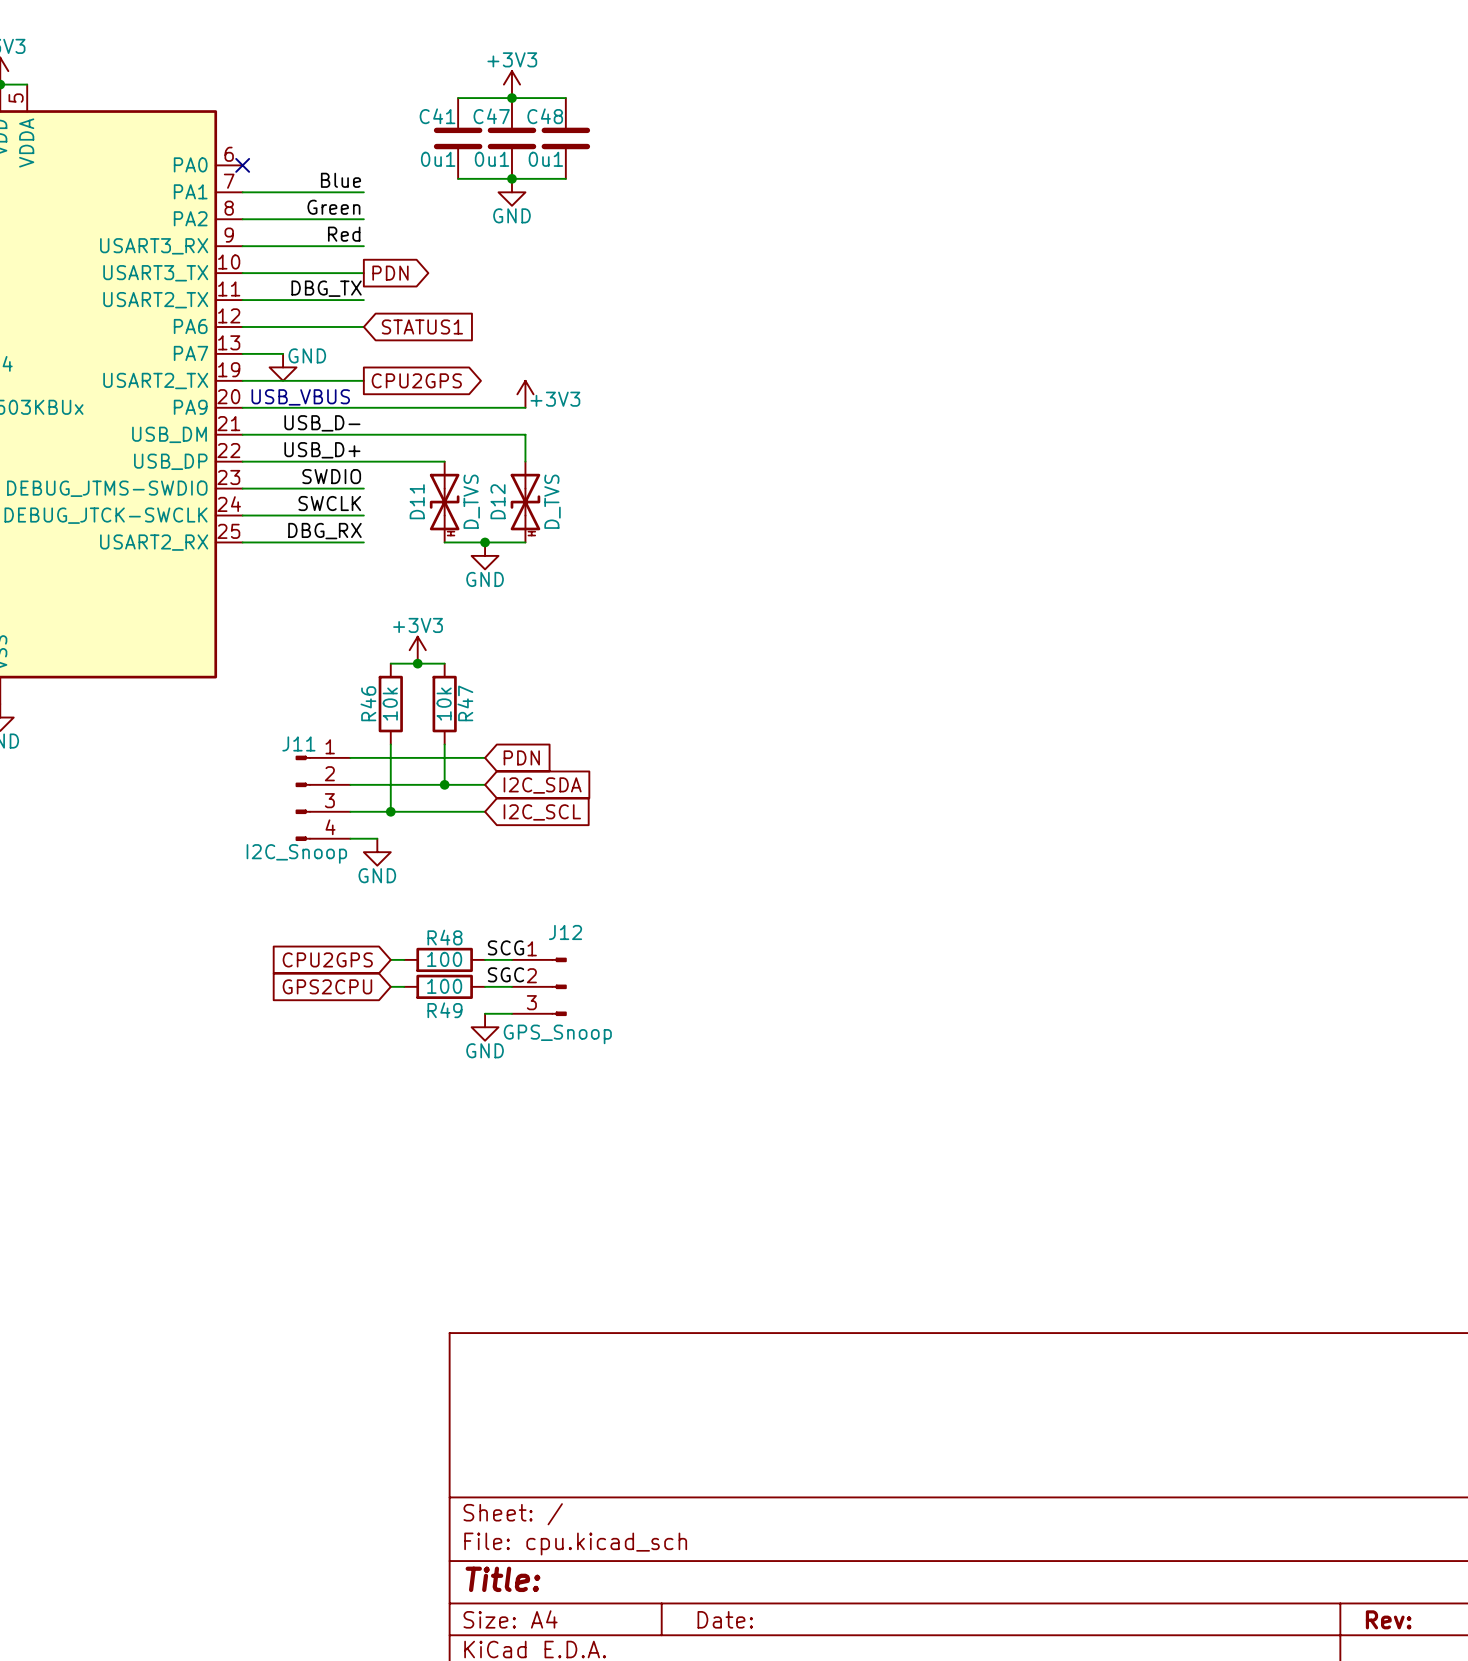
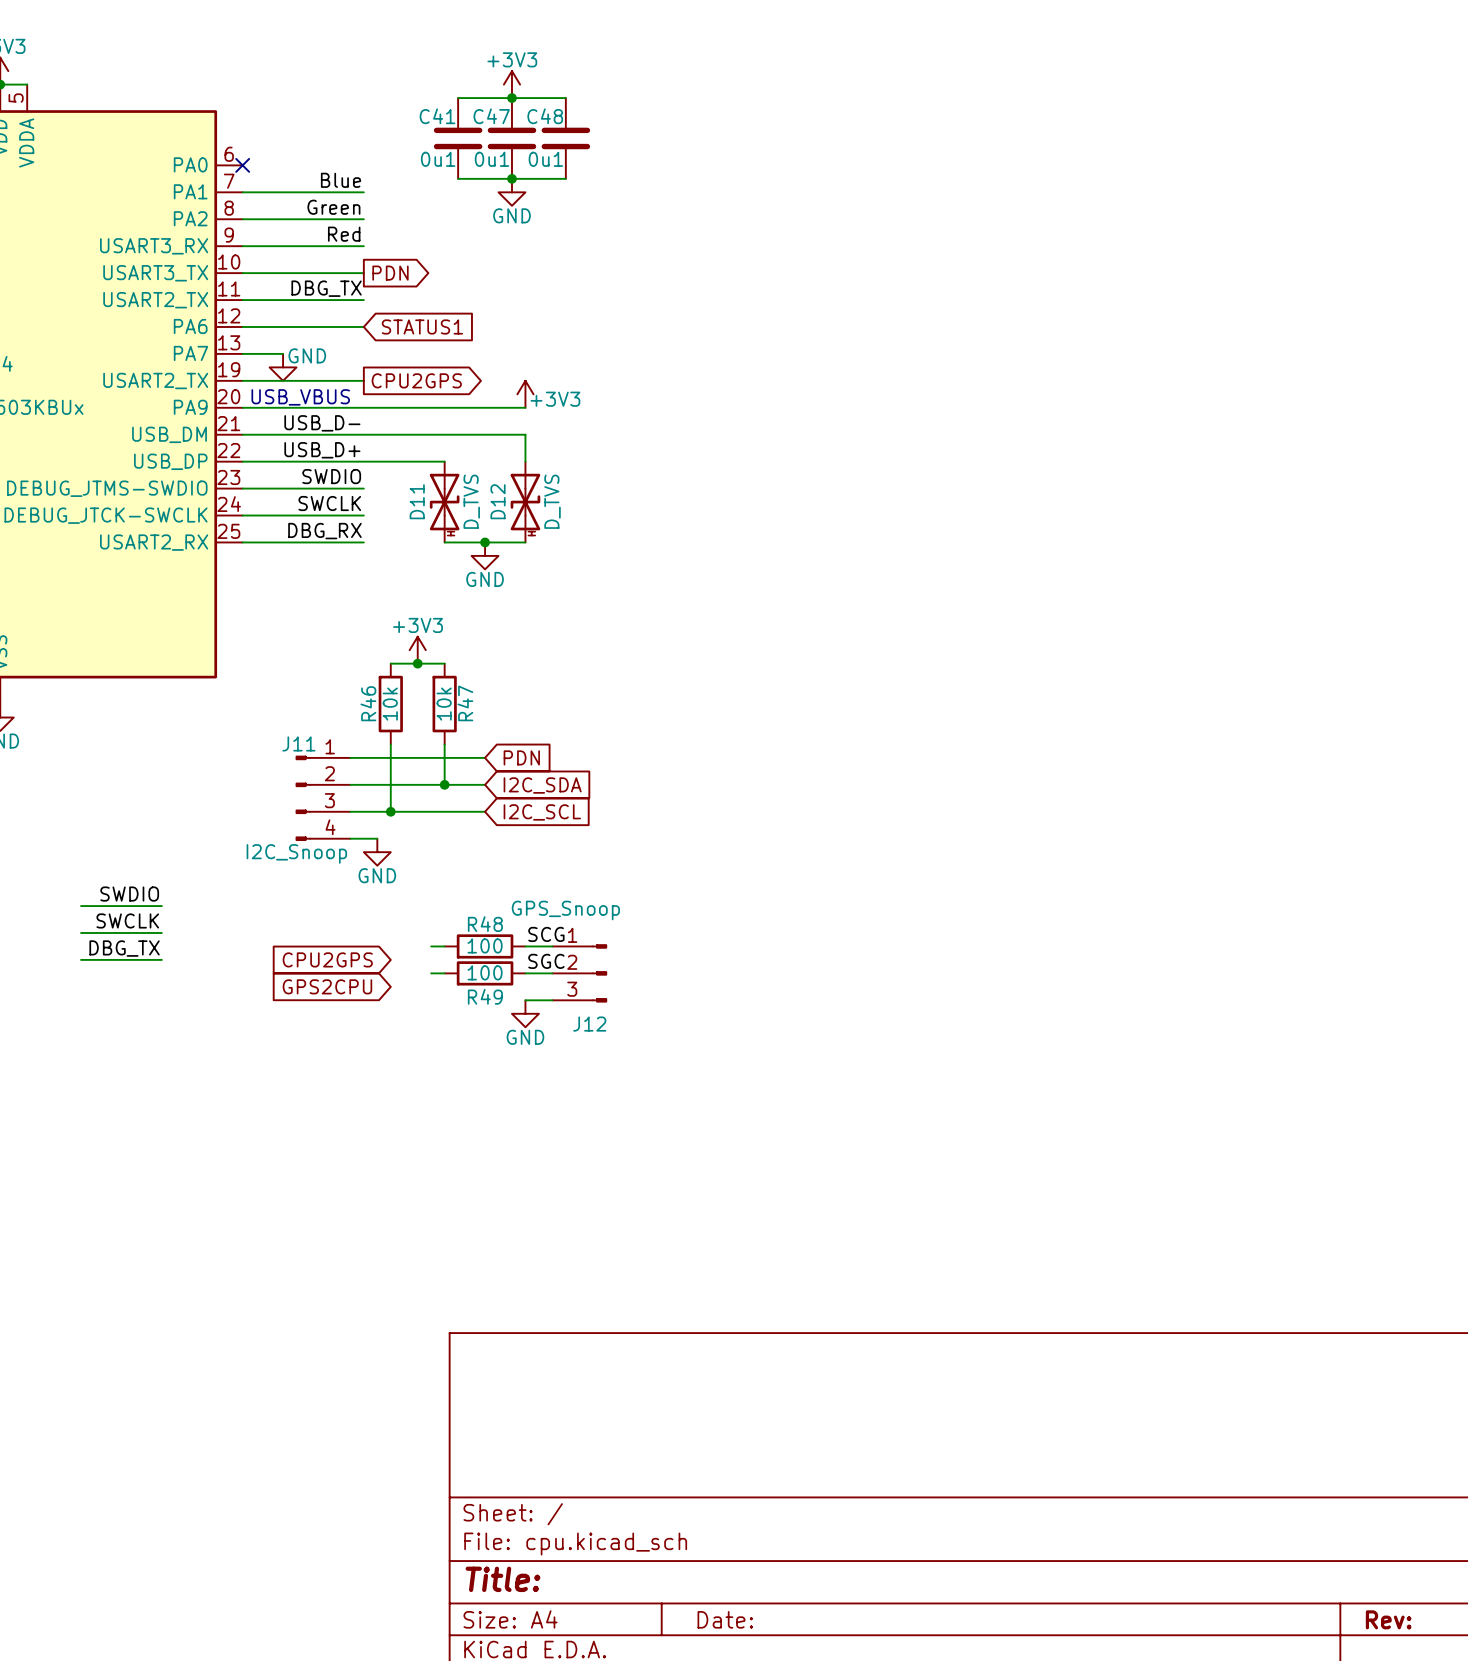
label: none -> SWDIO (129, 894)
wire: none -> (81, 906) (161, 906)
label: none -> SWCLK (127, 920)
wire: none -> (81, 932) (161, 932)
J12 name position: J12 (565, 932) -> J12 (589, 1024)
label position: SCG (505, 947) -> SCG (546, 934)
label: none -> DBG_TX (124, 948)
wire: none -> (81, 959) (161, 959)
wire: (390, 959) (404, 959) -> (431, 946) (444, 946)
R48 position: (444, 959) -> (485, 946)
wire: (485, 959) (511, 959) -> (525, 946) (552, 946)
label position: SGC (505, 974) -> SGC (546, 961)
wire: (390, 986) (404, 986) -> (431, 973) (444, 973)
R49 position: (444, 986) -> (485, 973)
wire: (485, 986) (511, 986) -> (525, 973) (552, 973)
J12 position: (539, 986) -> (579, 973)
wire: (485, 1013) (511, 1013) -> (525, 1000) (552, 1000)
power symbol position: GND (485, 1027) -> GND (525, 1013)
J12 value position: GPS_Snoop (557, 1034) -> GPS_Snoop (565, 910)

